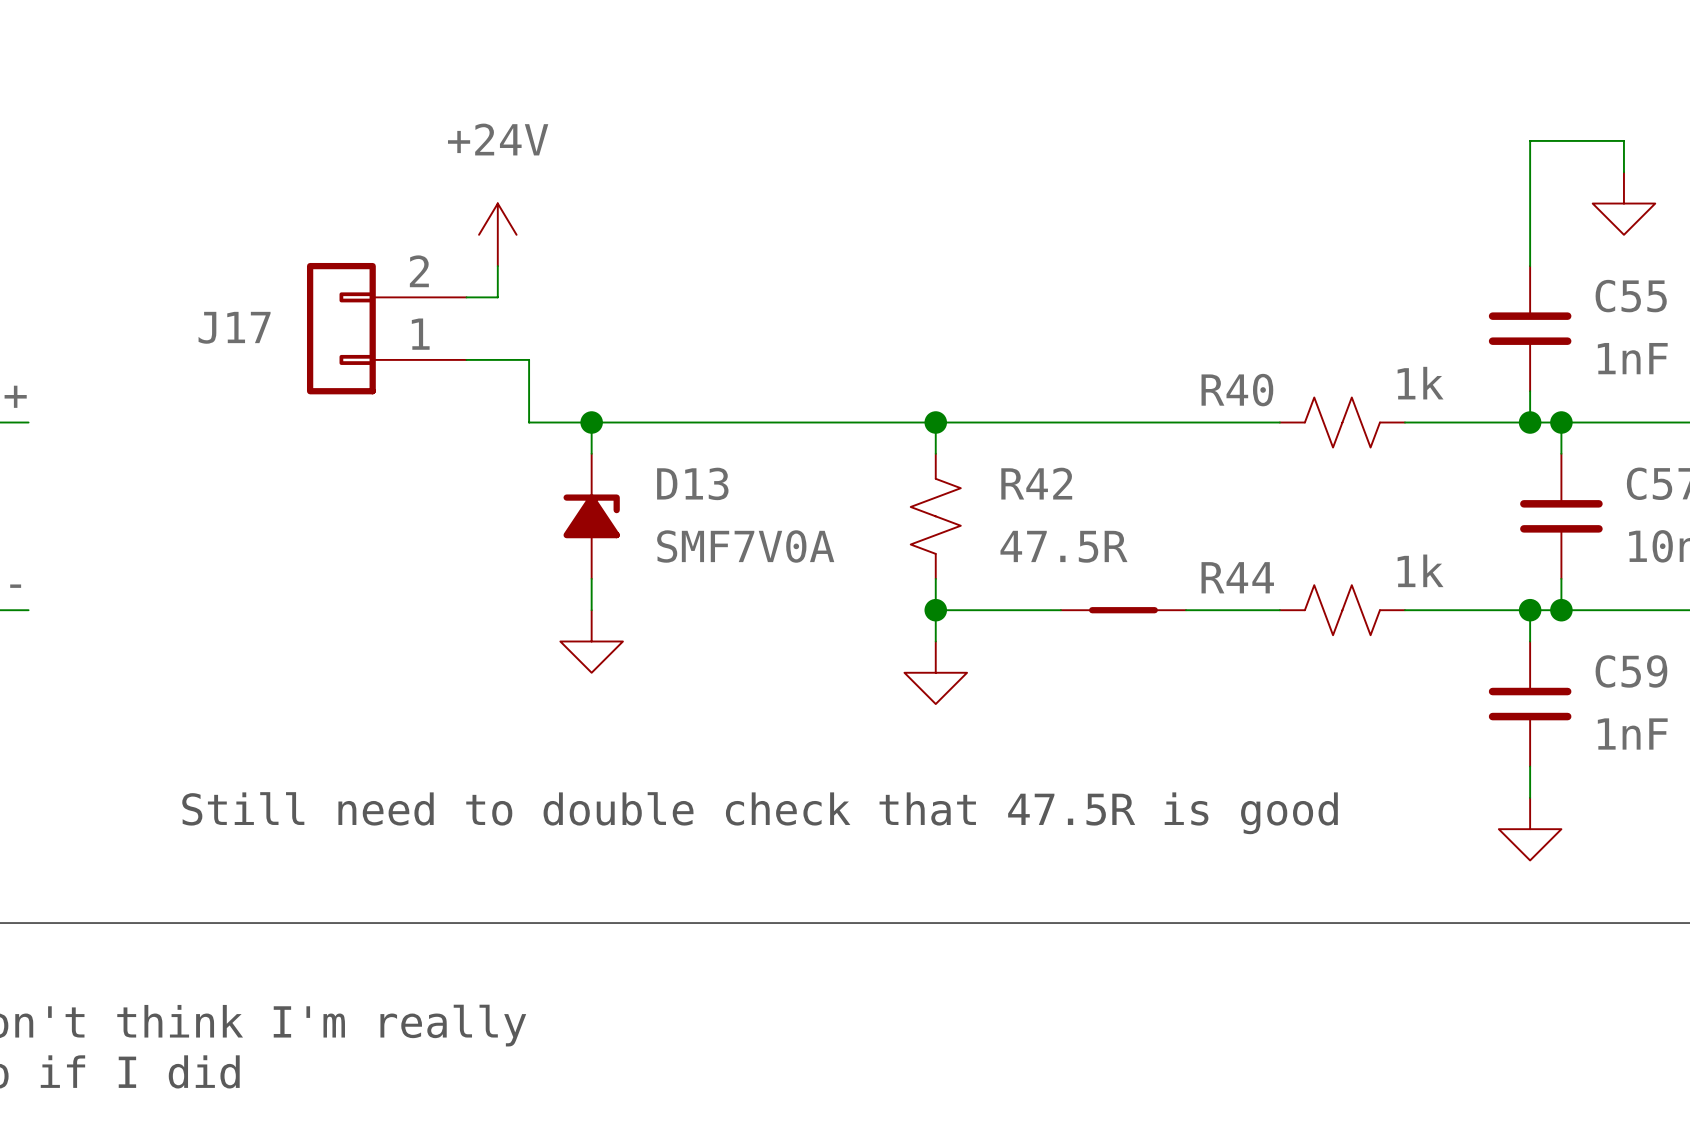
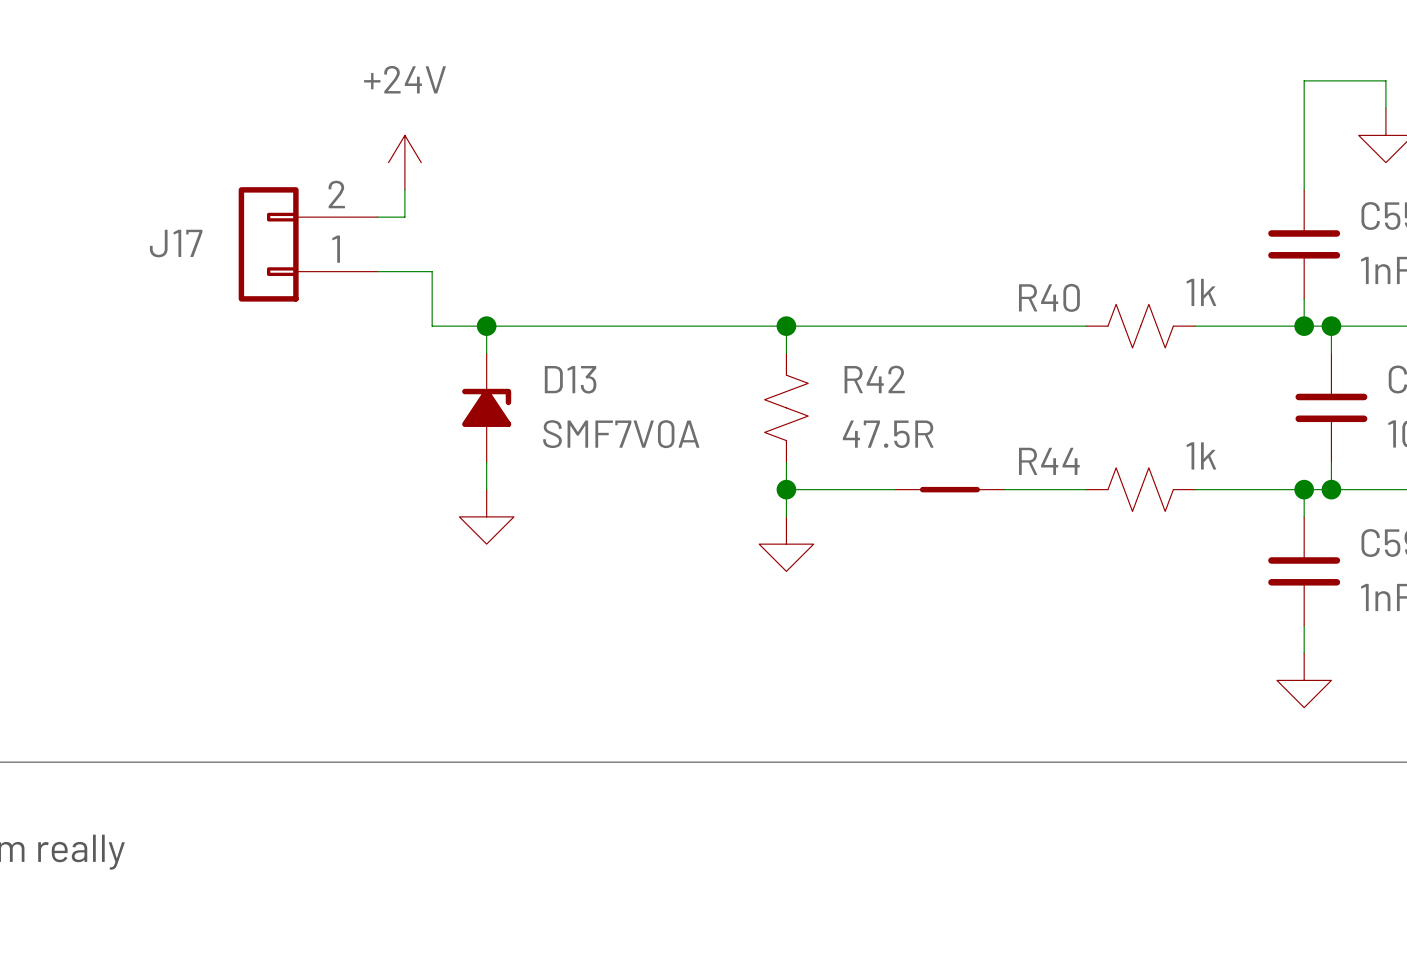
text: Still need to double check that 47.5R is good (760, 813) -> none

